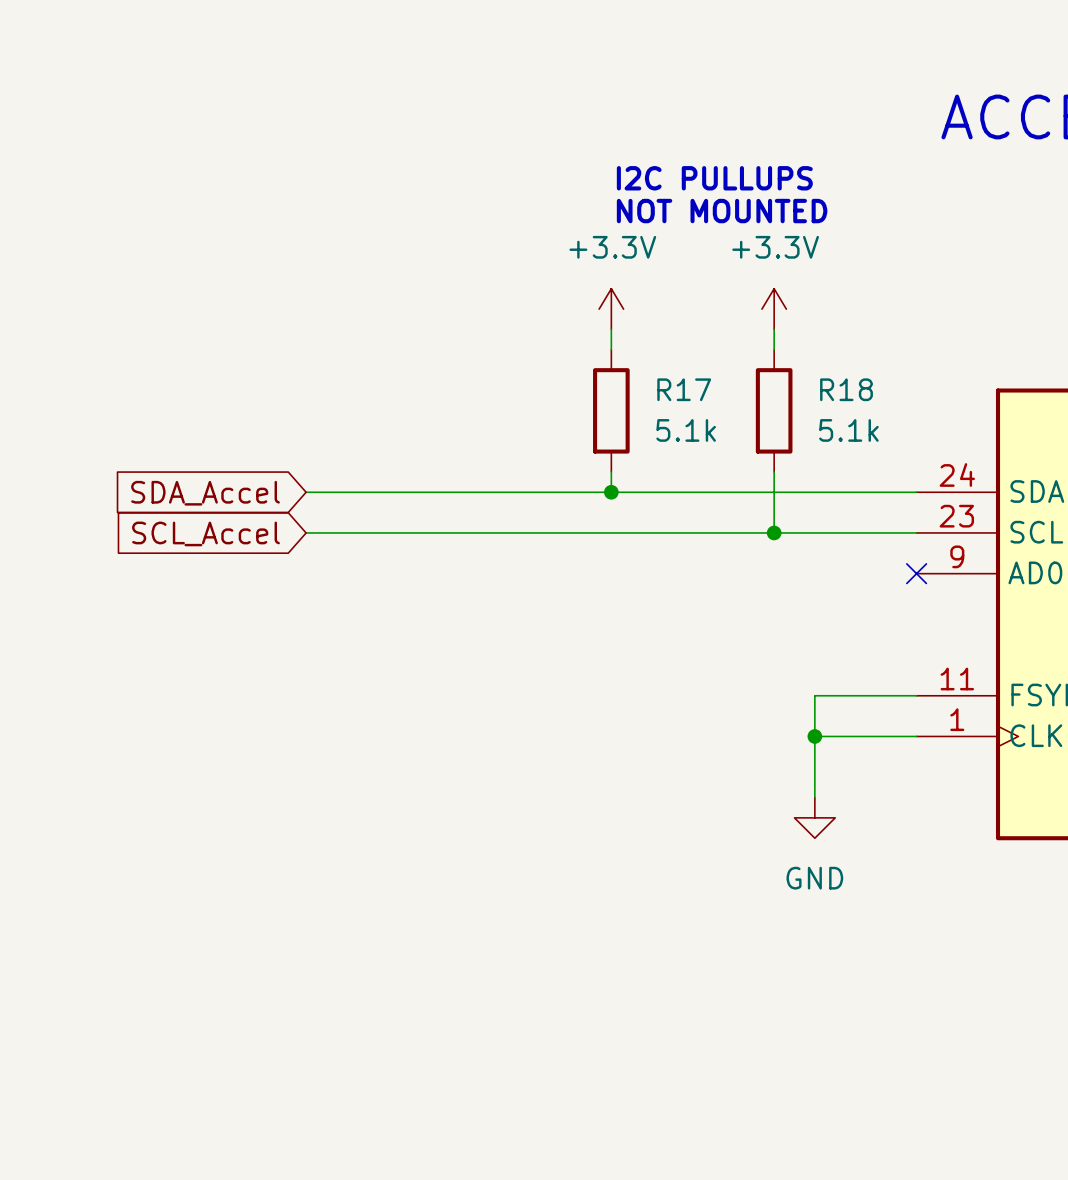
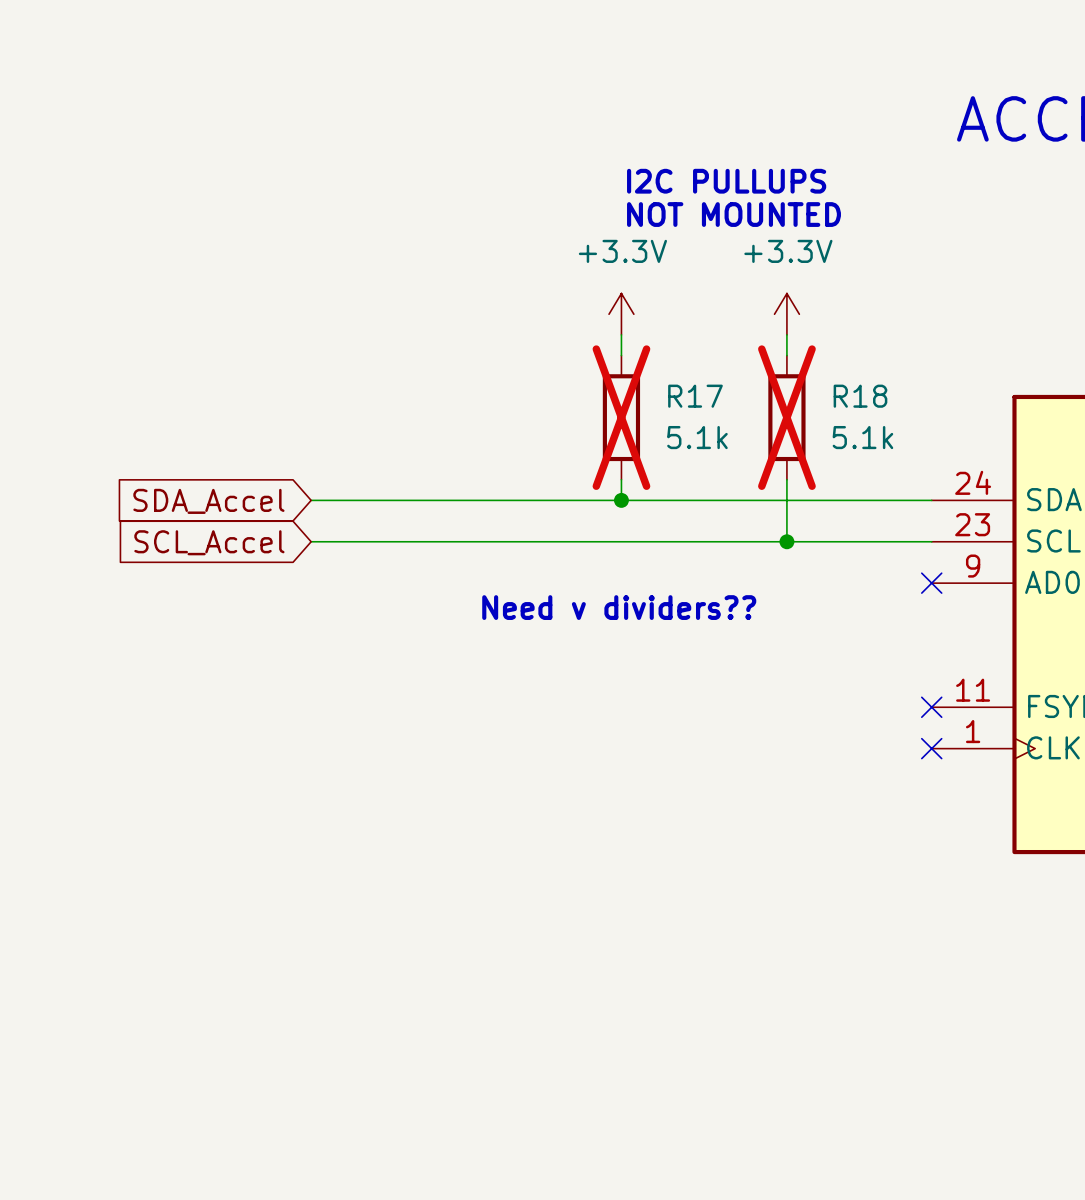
R17 do-not-place cross: none -> (621, 417)
R18 do-not-place cross: none -> (786, 417)
text: none -> Need v dividers?? (619, 607)
wire: (916, 695) (814, 695) (814, 797) -> none
no-connect mark: none -> (931, 707)
wire: (814, 736) (916, 736) -> none
junction: (814, 736) -> none
no-connect mark: none -> (931, 748)
power symbol: GND (814, 817) -> none

